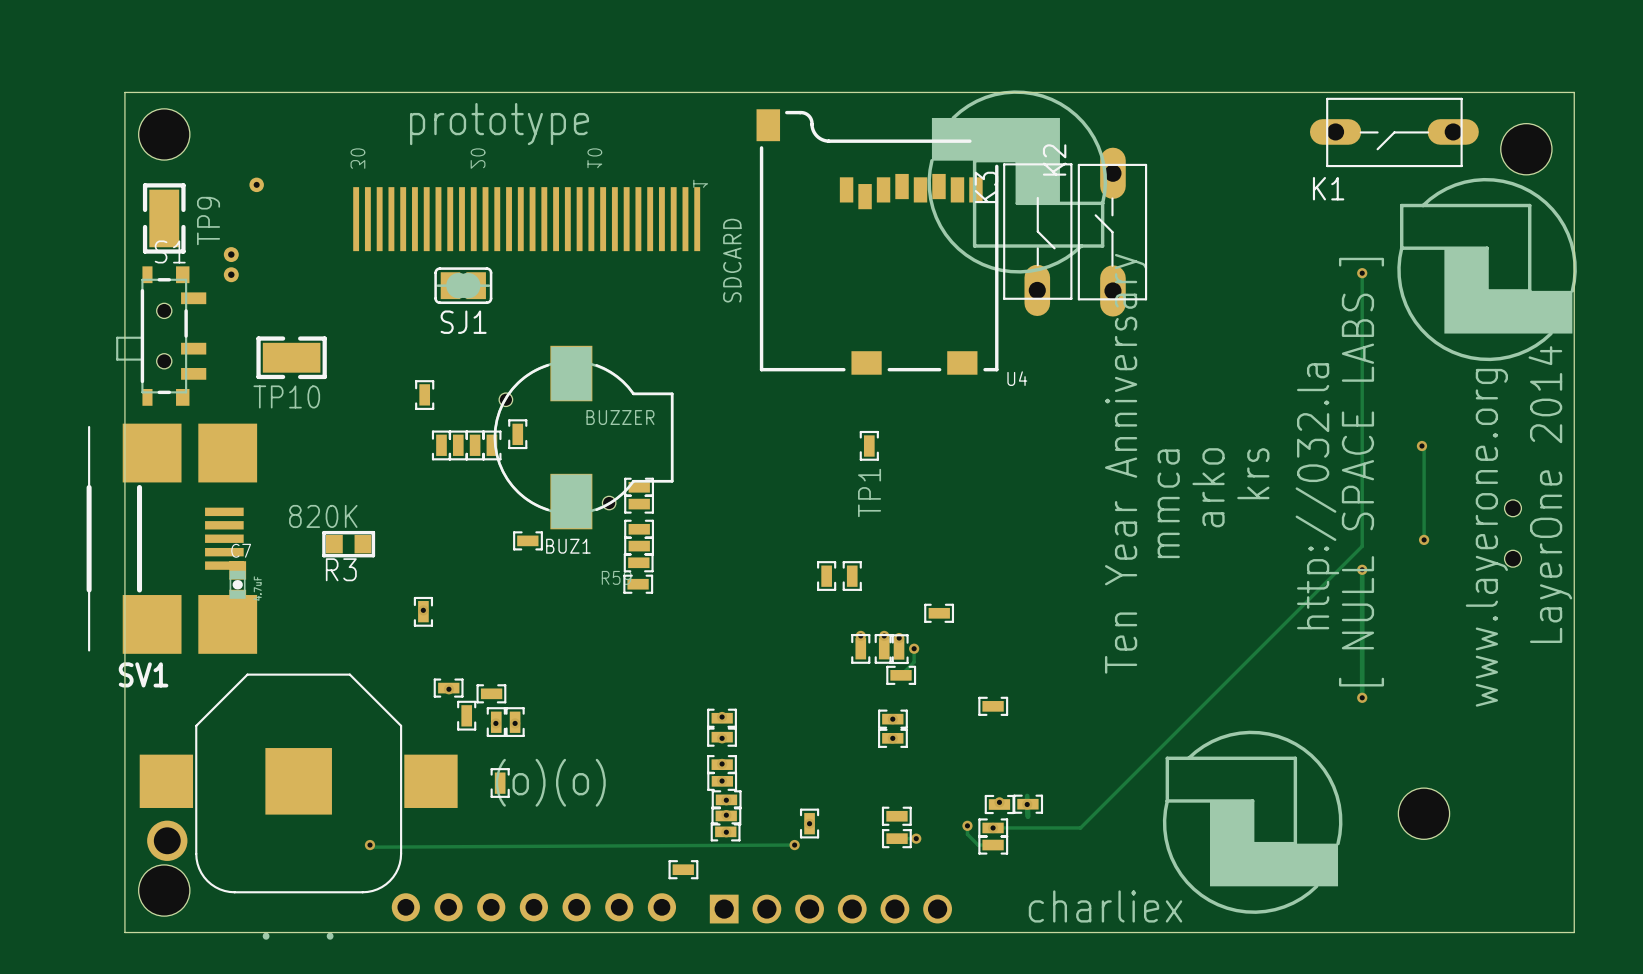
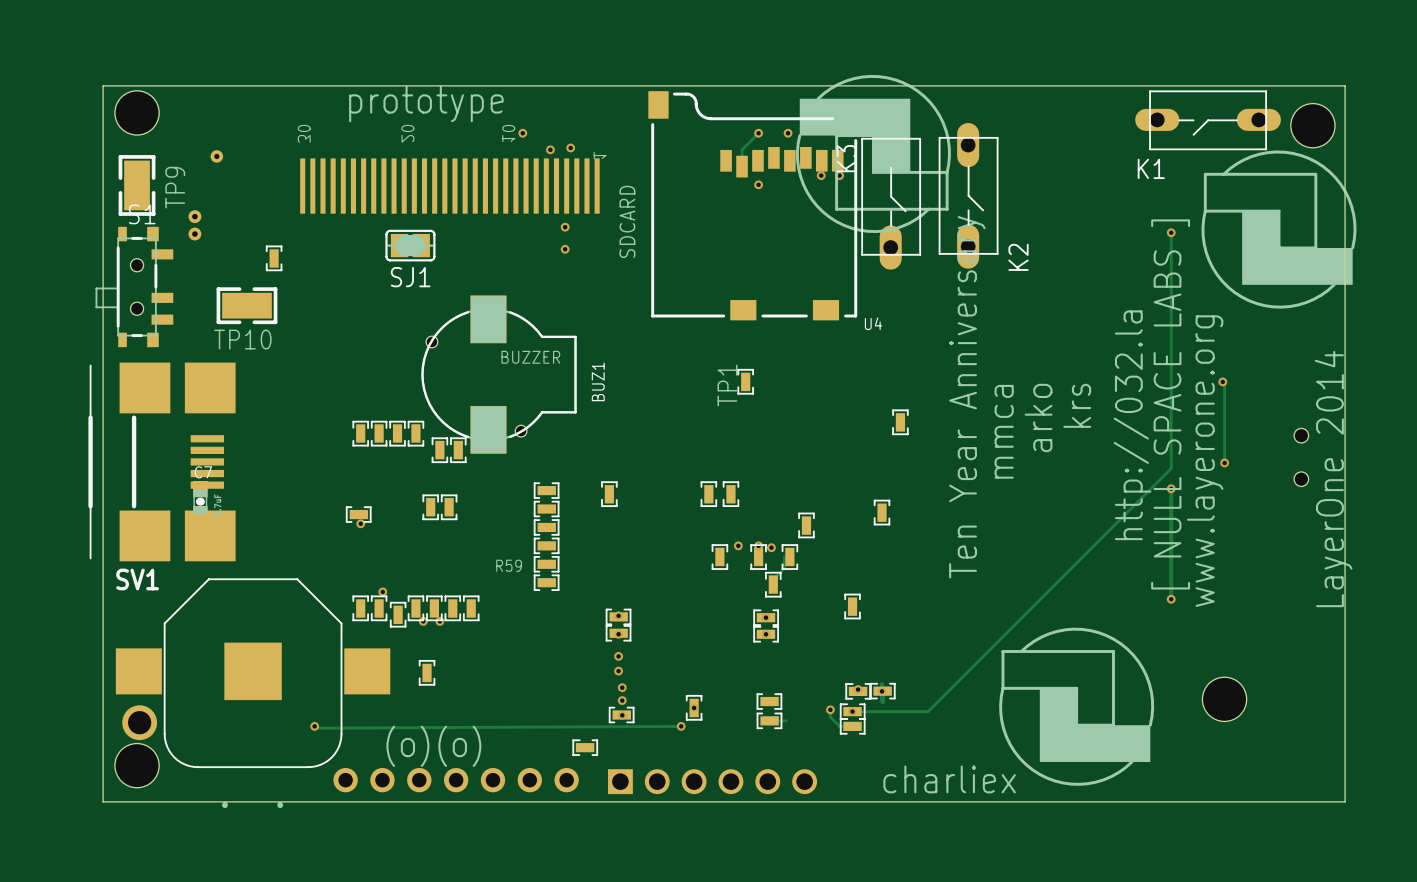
board edge: (124, 103) (124, 92) (1574, 92) (1574, 932) (1563, 932) -> (103, 85) (1345, 85) (1345, 801)
K1 position: (1394, 132) -> (1208, 120)
via: none -> (522, 133)
track: none -> (758, 133) (742, 149) (742, 166)
via: none -> (758, 133)
via: none -> (788, 133)
via: none -> (570, 147)
via: none -> (550, 149)
via: none -> (821, 175)
via: none -> (839, 175)
via: none -> (758, 184)
K2 rotation: 0° (1112, 232) -> 180° (968, 195)
via: none -> (565, 227)
SJ1 position: (463, 285) -> (410, 245)
via: none -> (565, 249)
part: none -> (274, 258)
part: (424, 395) -> none
part: (517, 434) -> none
part: (441, 445) -> none
part: (458, 445) -> none
part: (475, 445) -> none
part: (491, 445) -> none
part: (639, 487) -> none
TP1 name position: TP1 (869, 492) -> TP1 (727, 385)
part: none -> (900, 422)
text position: LayerOne 2014 (1550, 494) -> LayerOne 2014 (1333, 479)
part: (639, 504) -> none
part: none -> (360, 433)
part: none -> (379, 433)
part: none -> (397, 433)
part: none -> (415, 433)
part: none -> (439, 450)
part: none -> (458, 450)
part: (639, 529) -> none
text position: www.layerone.org (1486, 537) -> www.layerone.org (1205, 461)
SV1 position: (171, 538) -> (162, 461)
part: (528, 540) -> none
R3: 820K (348, 544) -> none
BUZ1 name rotation: 0° (568, 546) -> 90° counterclockwise (598, 381)
BUZ1 name position: BUZ1 (568, 546) -> BUZ1 (598, 381)
part: (639, 546) -> none
part: (638, 562) -> none
part: none -> (546, 490)
part: none -> (609, 494)
R59 position: (616, 577) -> (509, 565)
part: (638, 584) -> none
part: none -> (430, 507)
part: none -> (449, 507)
part: none -> (546, 509)
part: none -> (882, 512)
part rotation: 0° (423, 611) -> 90° clockwise (358, 514)
part rotation: 0° (939, 613) -> 90° clockwise (806, 525)
part: none -> (546, 527)
part: none -> (546, 545)
part position: (860, 648) -> (719, 557)
via: (914, 648) -> none
part position: (899, 649) -> (789, 557)
part: none -> (546, 564)
part rotation: 0° (901, 675) -> 90° clockwise (773, 584)
part: none -> (546, 582)
part: (448, 688) -> none
part: (491, 693) -> none
part rotation: 0° (993, 706) -> 90° counterclockwise (852, 606)
part: none -> (360, 608)
part: none -> (379, 608)
part: none -> (415, 608)
part: none -> (434, 608)
part: none -> (452, 608)
part: none -> (471, 608)
part: (496, 722) -> none
part: (515, 722) -> none
part: (722, 764) -> none
part: (722, 781) -> none
text position: (o)(o) (550, 782) -> (o)(o) (433, 746)
part: (726, 799) -> none
part: (726, 815) -> none
via: (916, 838) -> none

